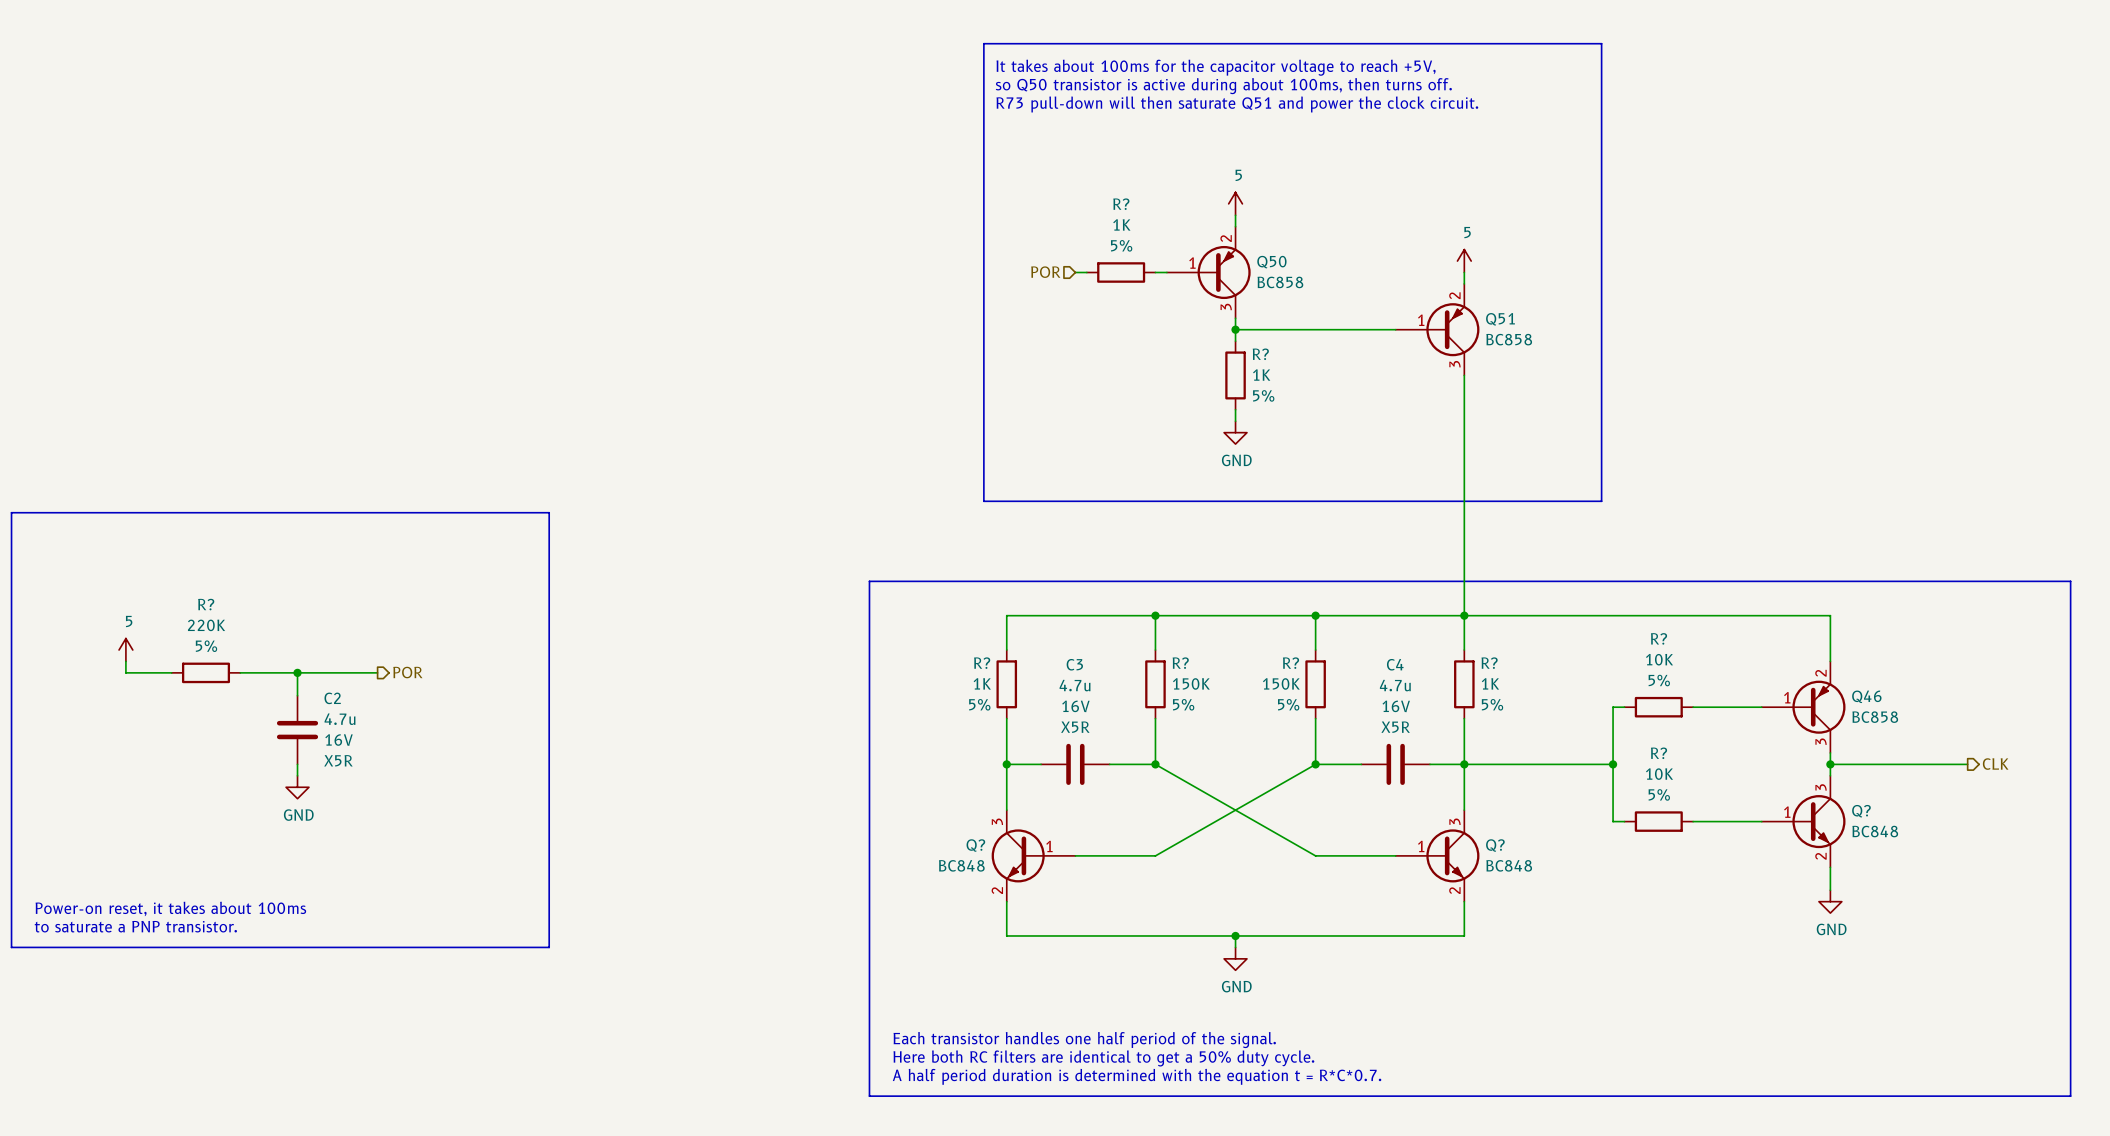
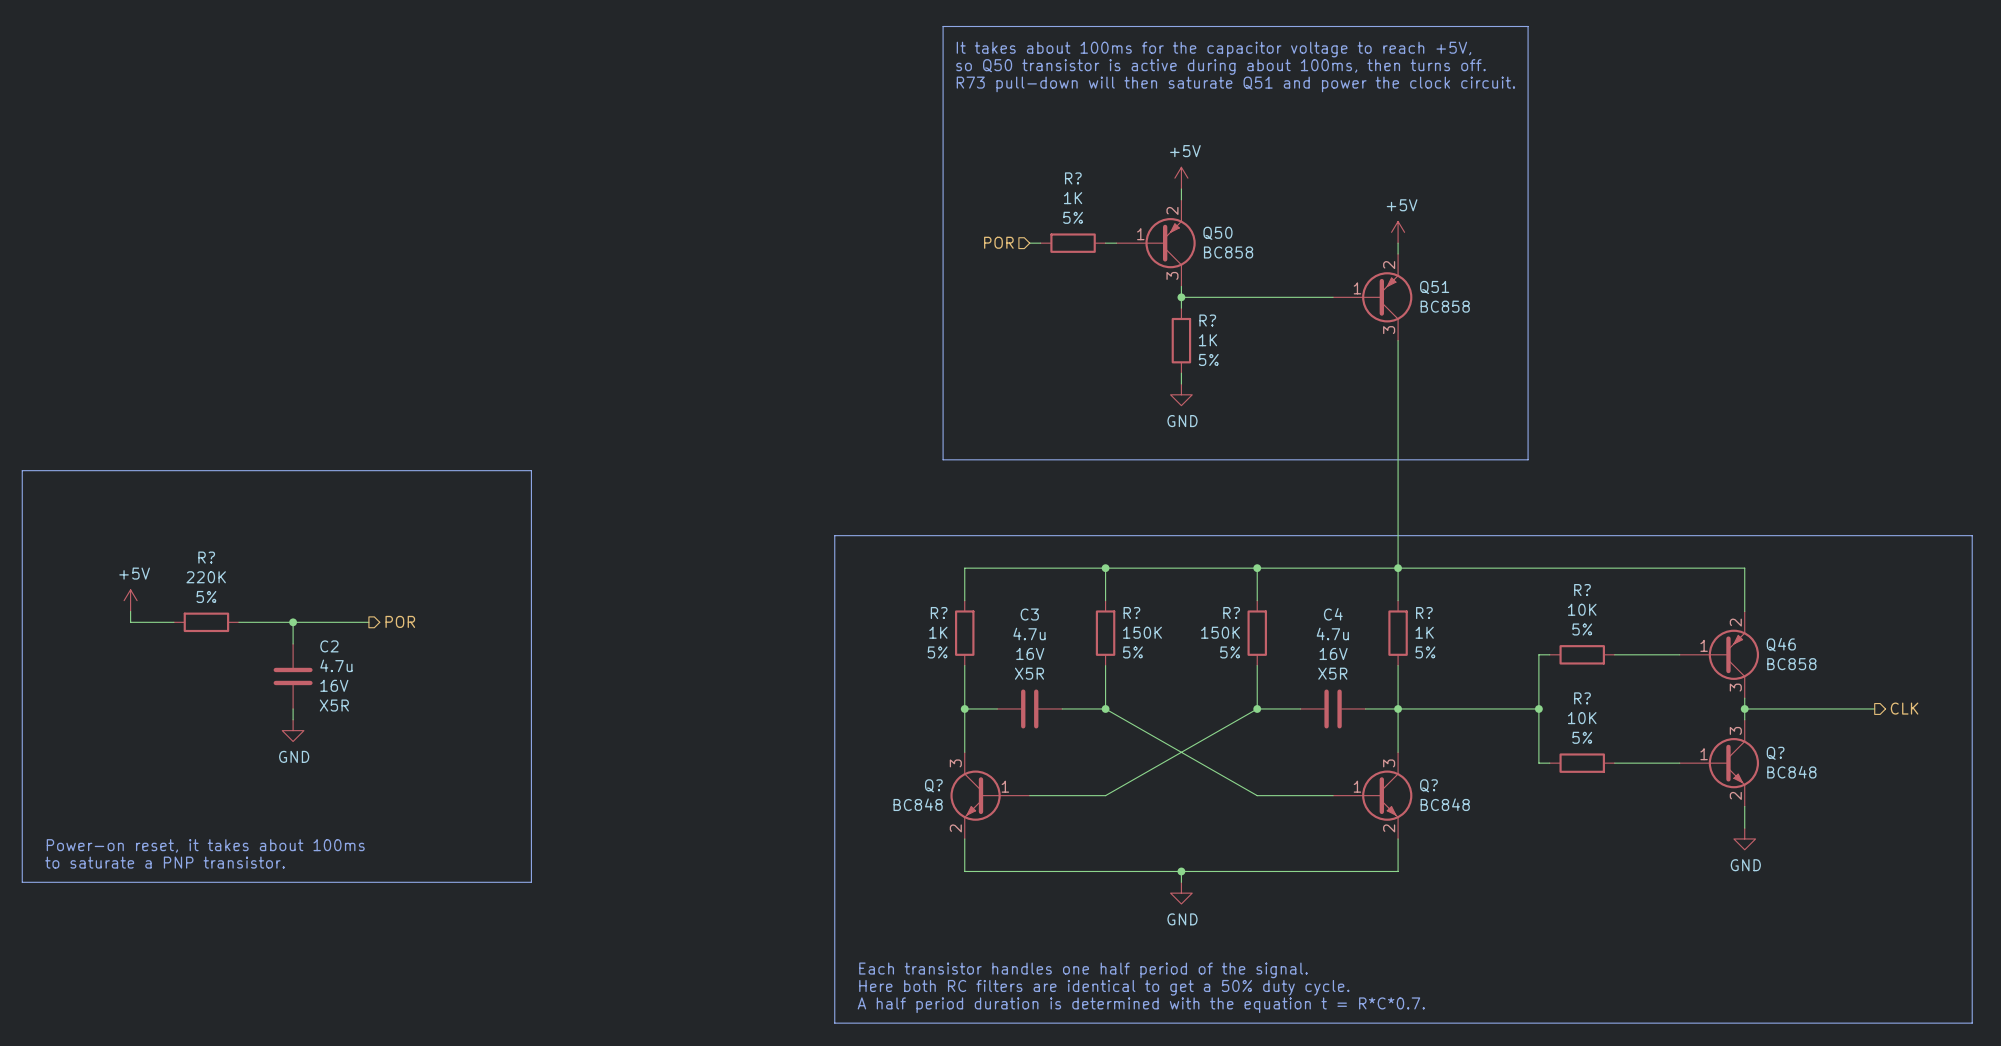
power symbol: 5 (1235, 203) -> +5V (1181, 178)
power symbol: 5 (1464, 261) -> +5V (1398, 232)
power symbol: 5 (125, 650) -> +5V (130, 600)

